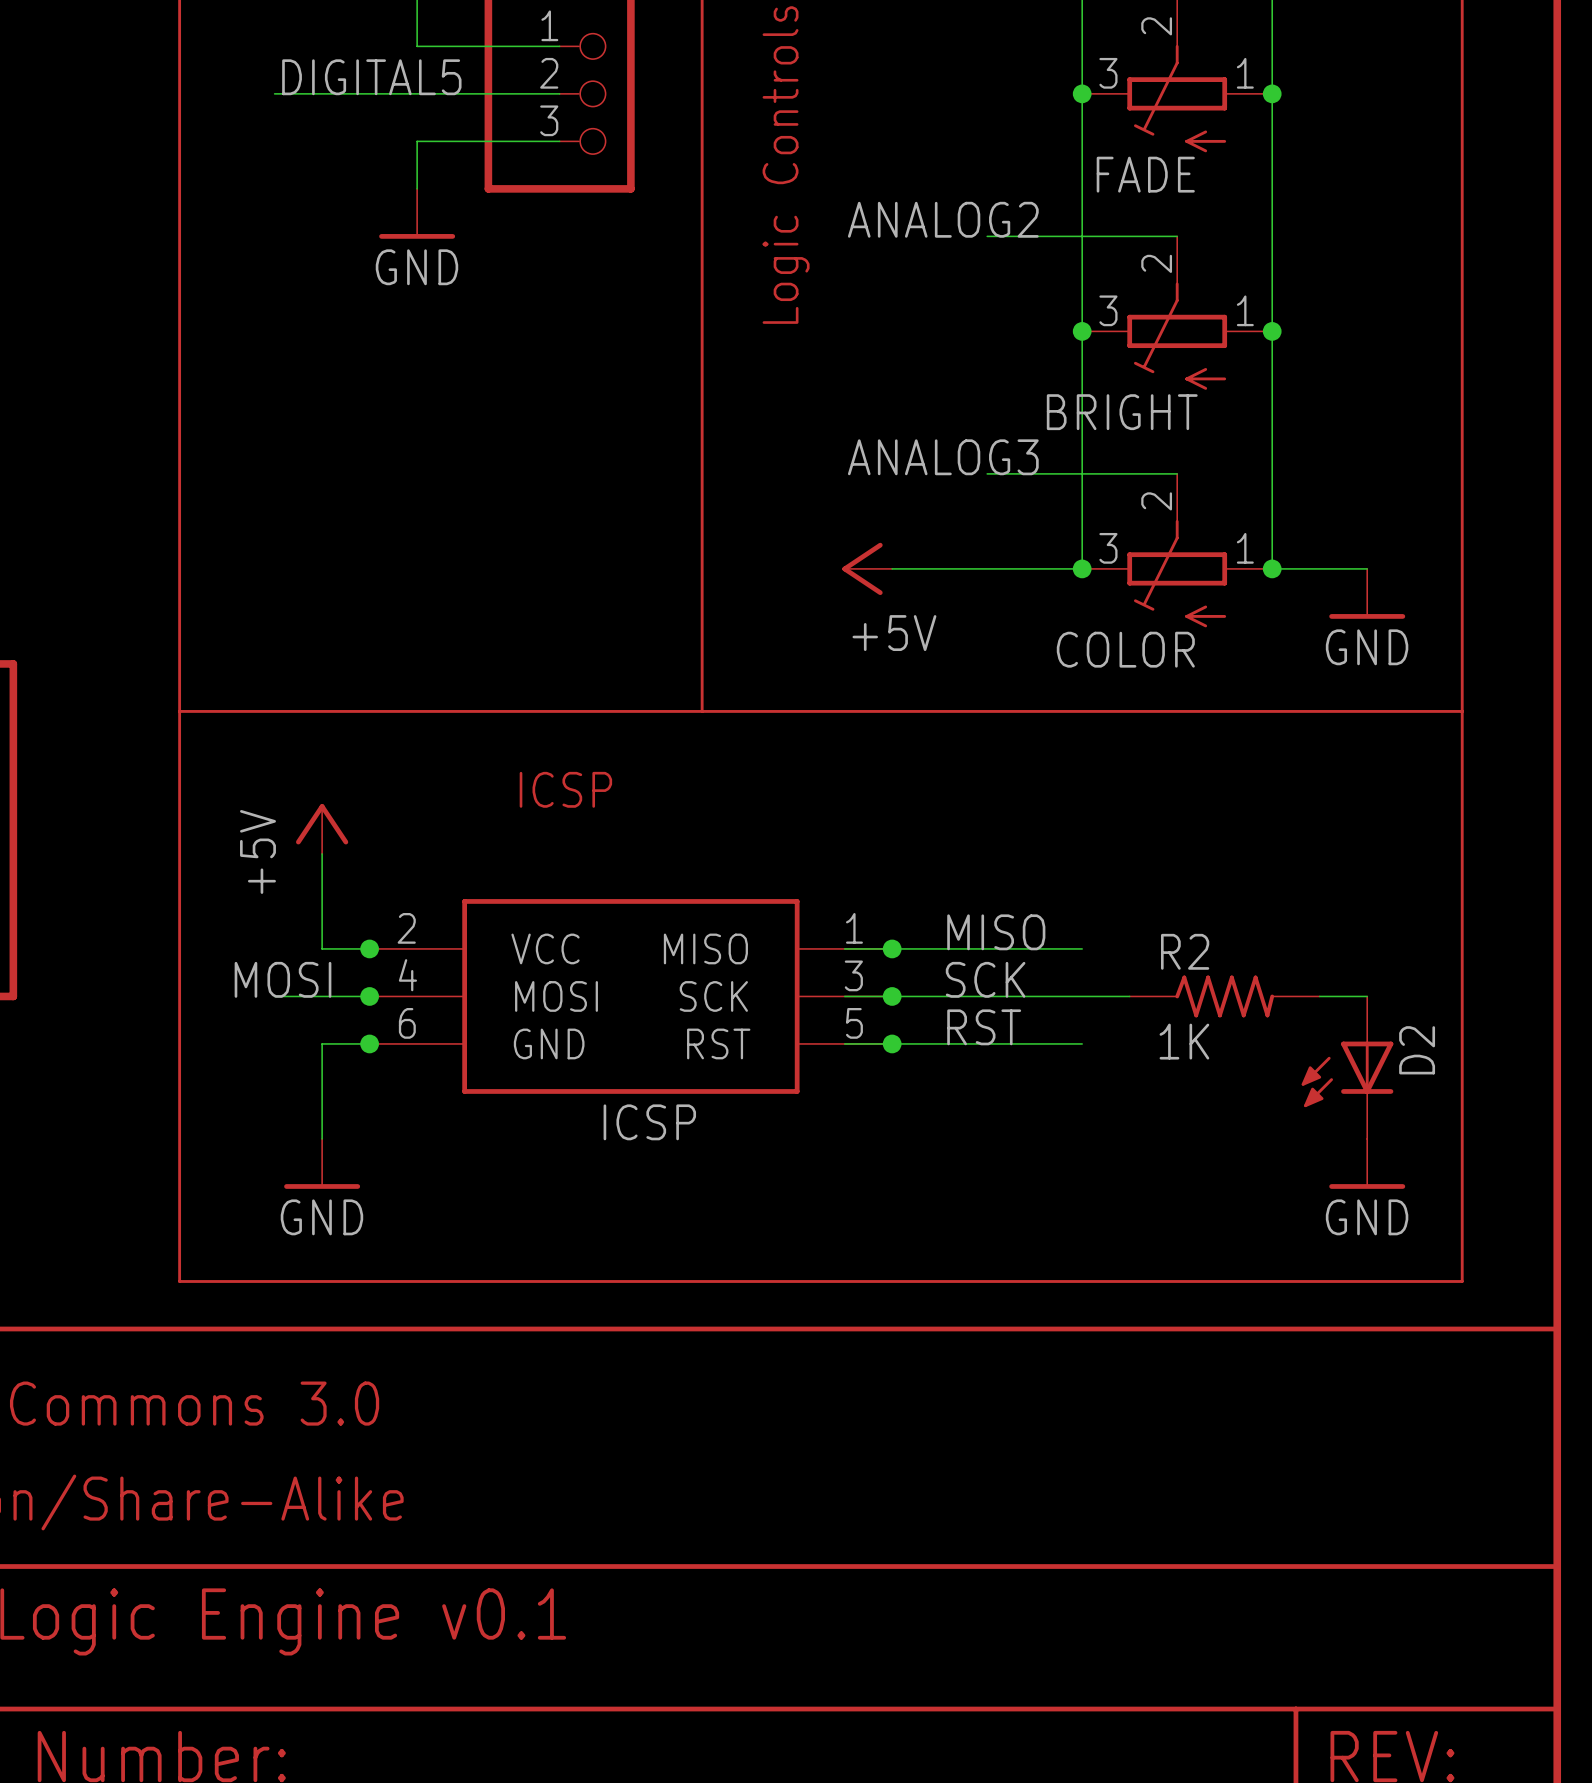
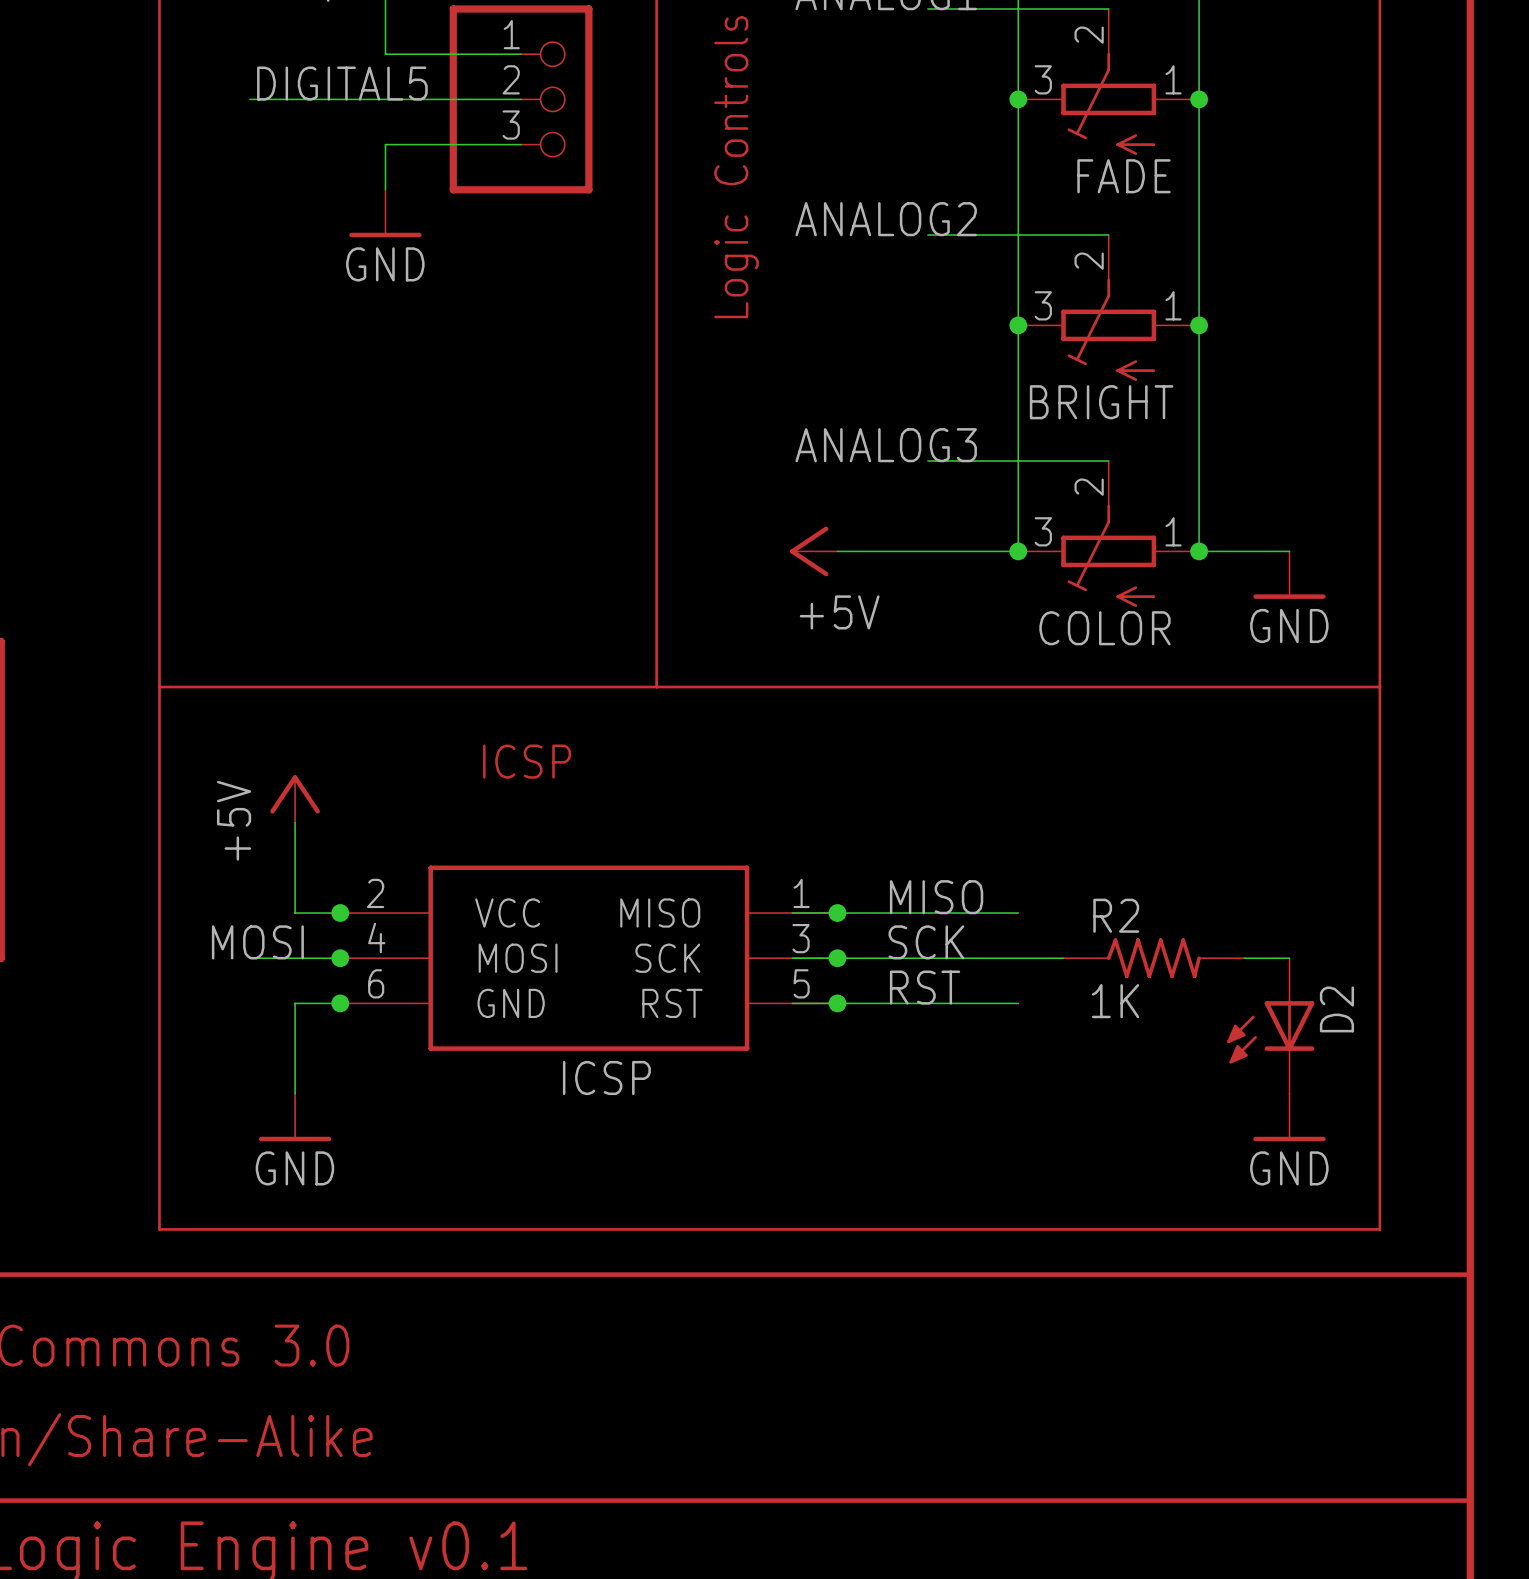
FADE name position: FADE (1145, 174) -> FADE (1123, 176)
BRIGHT name position: BRIGHT (1122, 412) -> BRIGHT (1101, 402)
COLOR name position: COLOR (1125, 649) -> COLOR (1105, 628)

